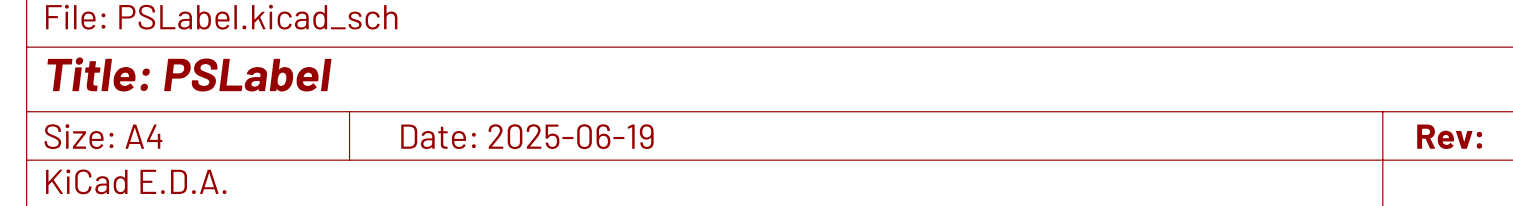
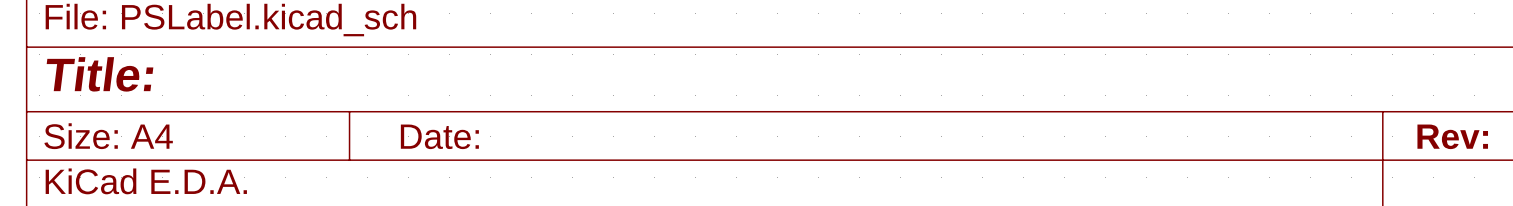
title block: Title: PSLabel (189, 74) -> Title: (100, 74)
title block: Date: 2025-06-19 (527, 136) -> Date: (439, 136)

